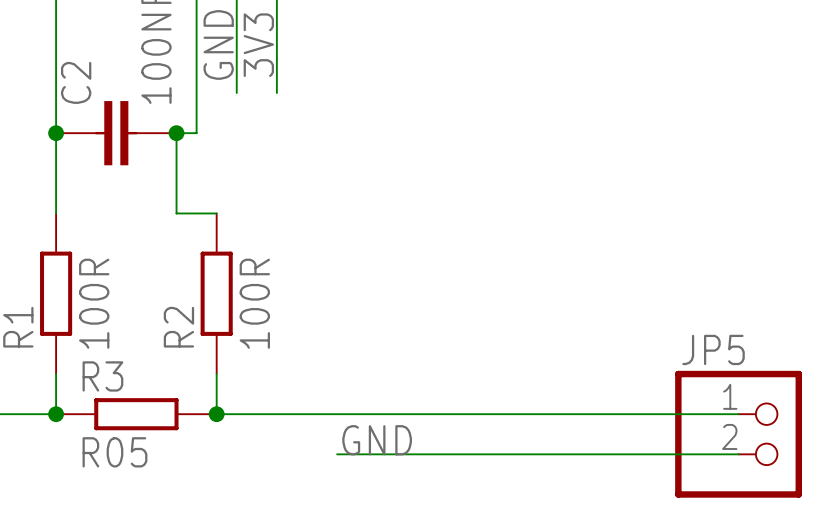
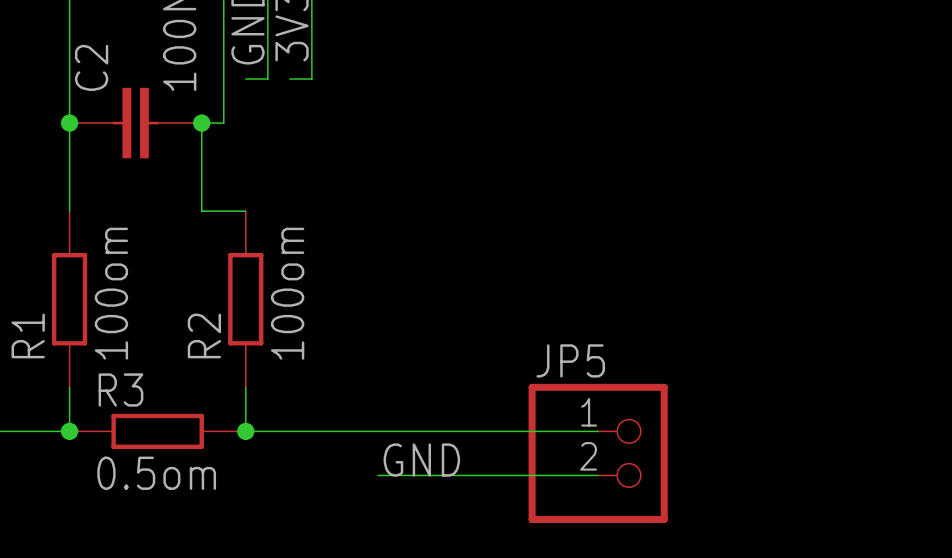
wire: none -> (245, 79) (267, 79)
wire: none -> (289, 79) (311, 79)
R1 value: 100R (94, 303) -> 100om (111, 293)
R2 value: 100R (254, 303) -> 100om (287, 293)
wire: (537, 414) (738, 414) -> none
JP5 position: (738, 434) -> (598, 453)
R3 value: R05 (114, 452) -> 0.5om (156, 473)
wire: (537, 454) (738, 454) -> none

